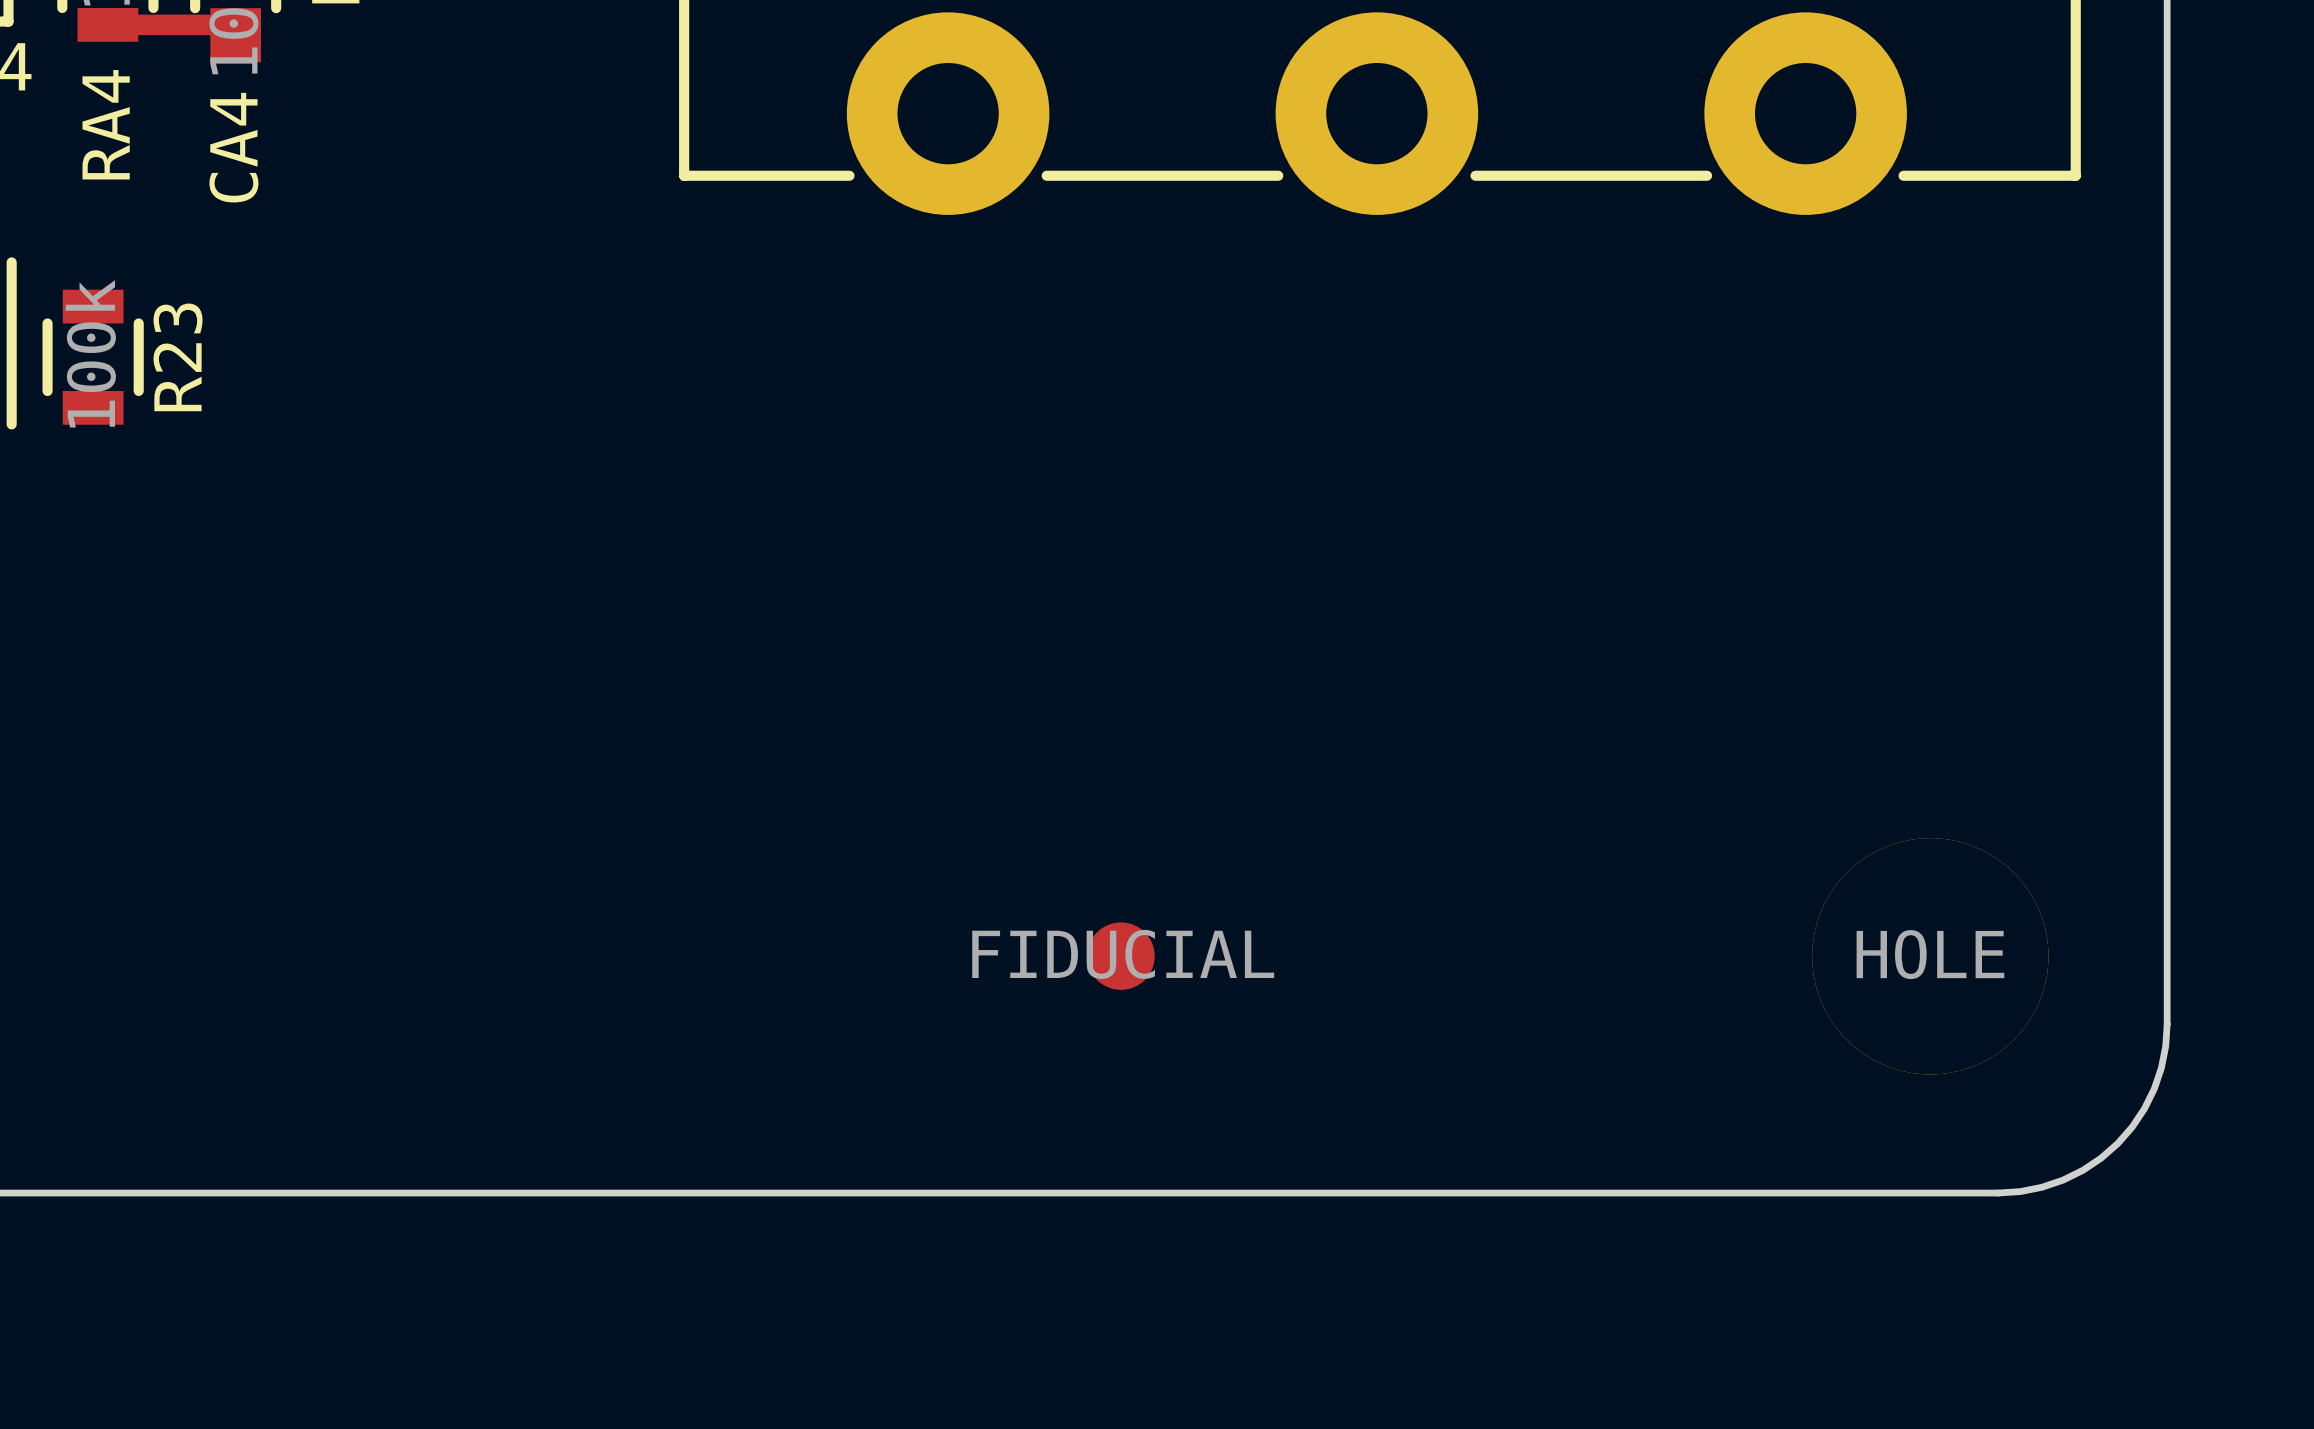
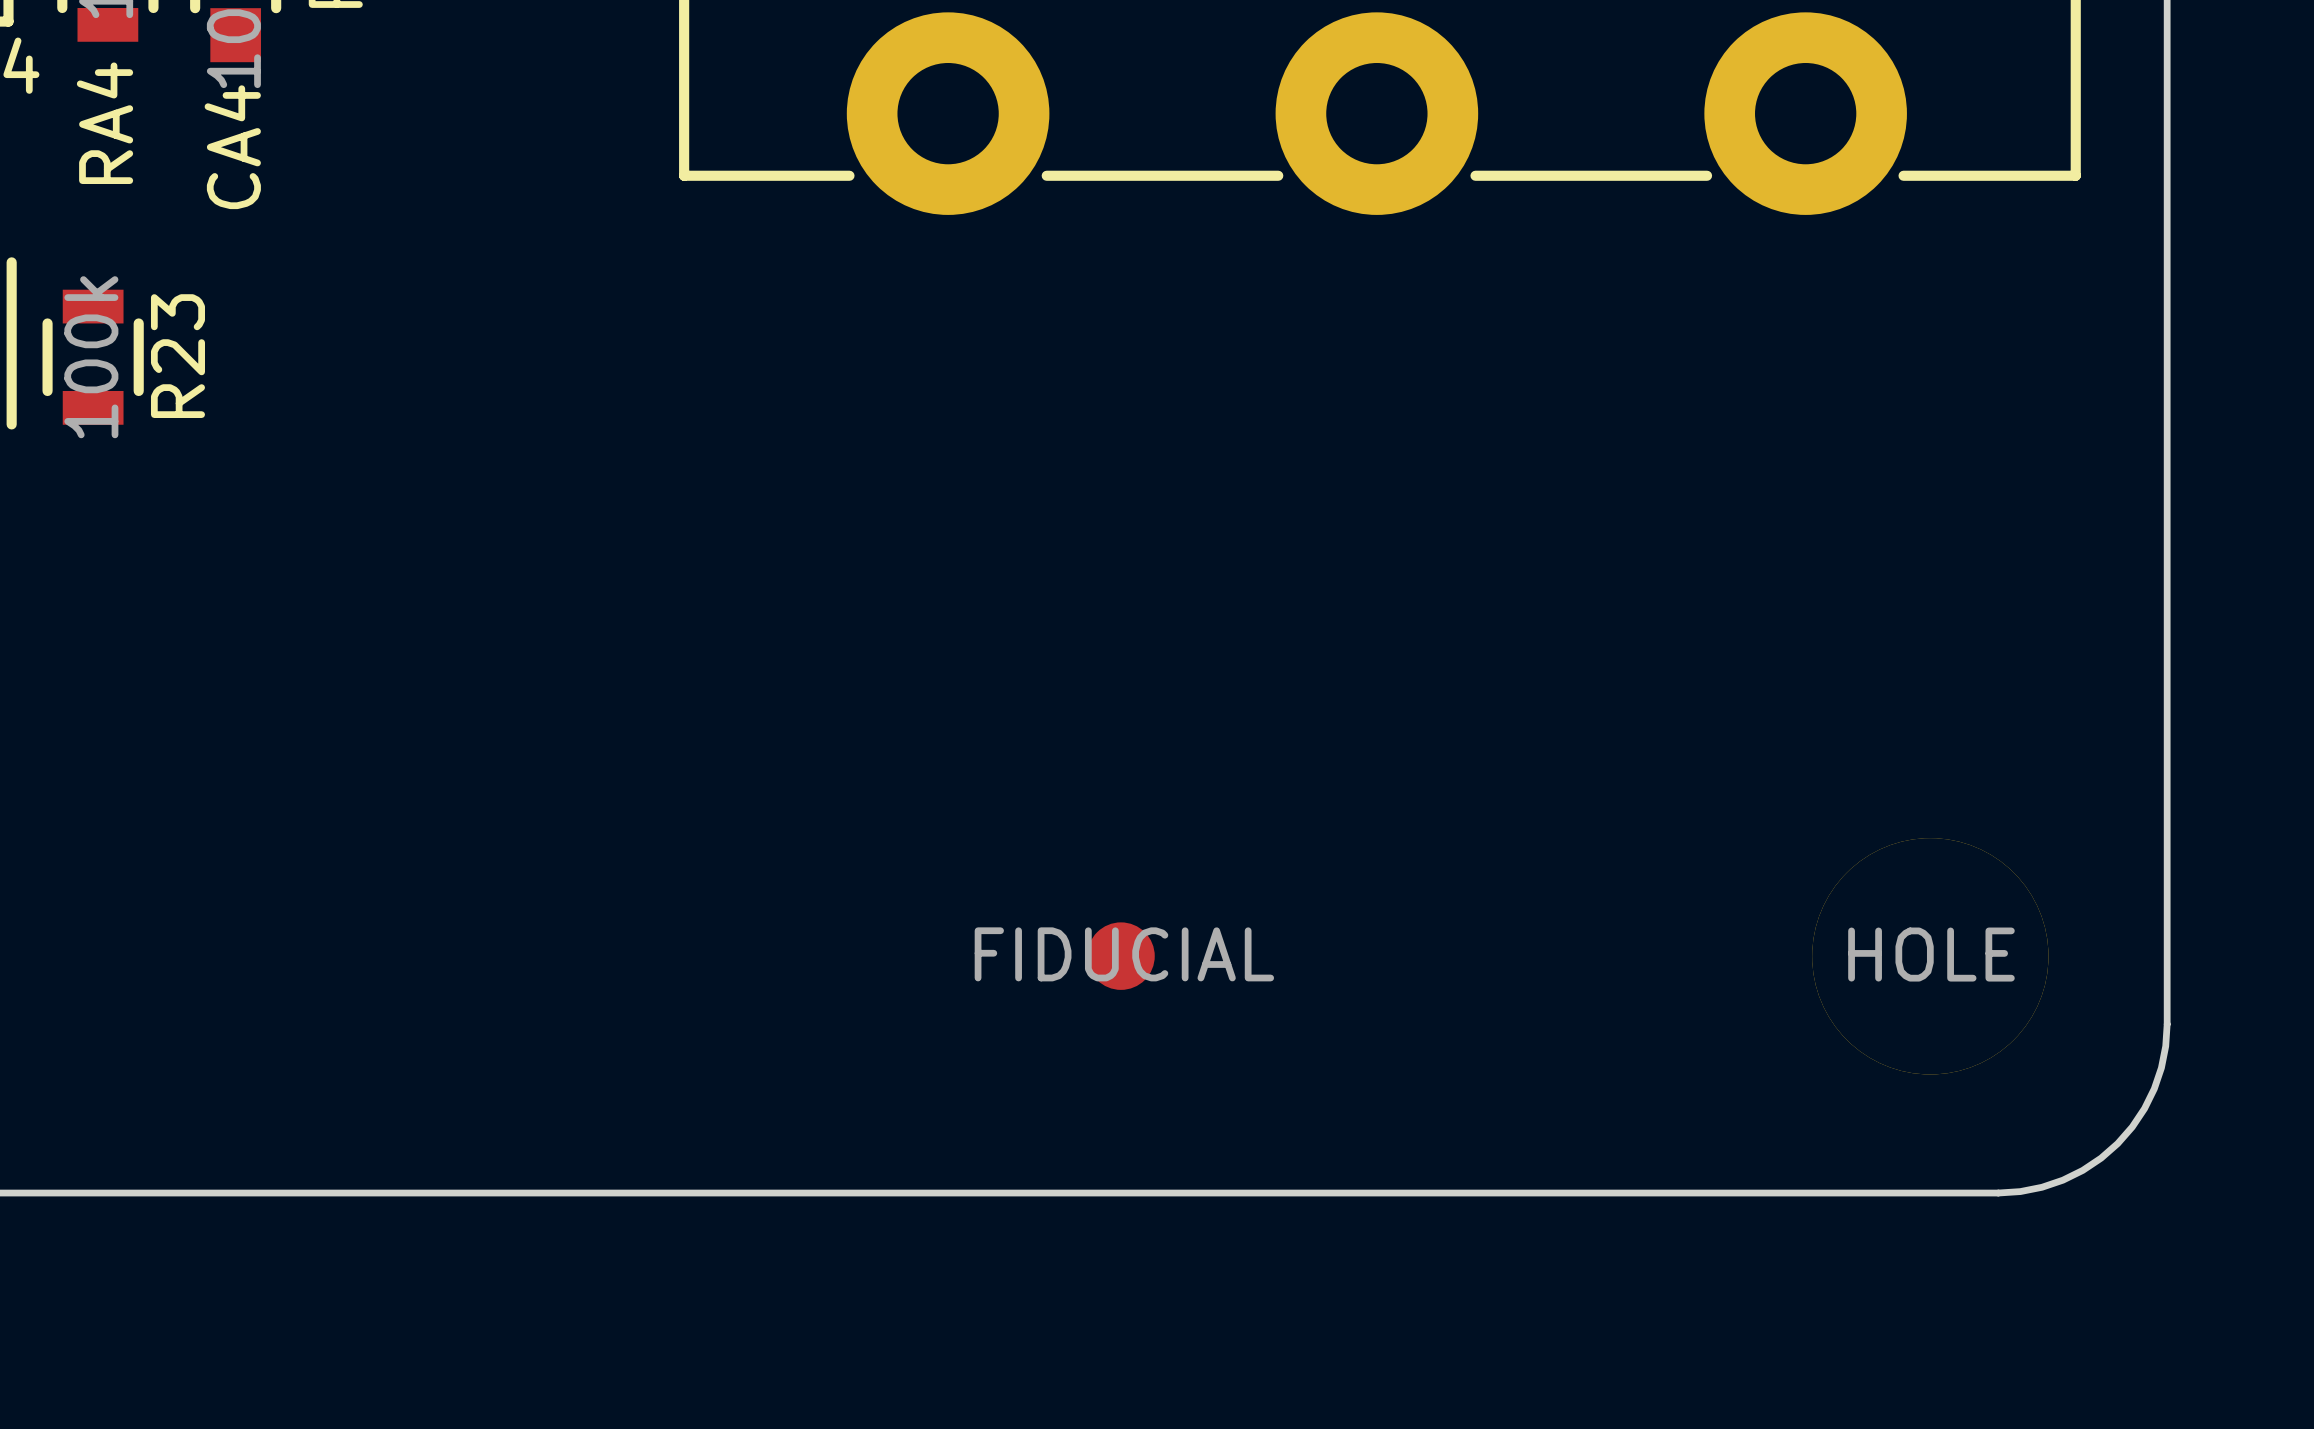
track: (107, 24) (225, 24) (235, 35) -> none

